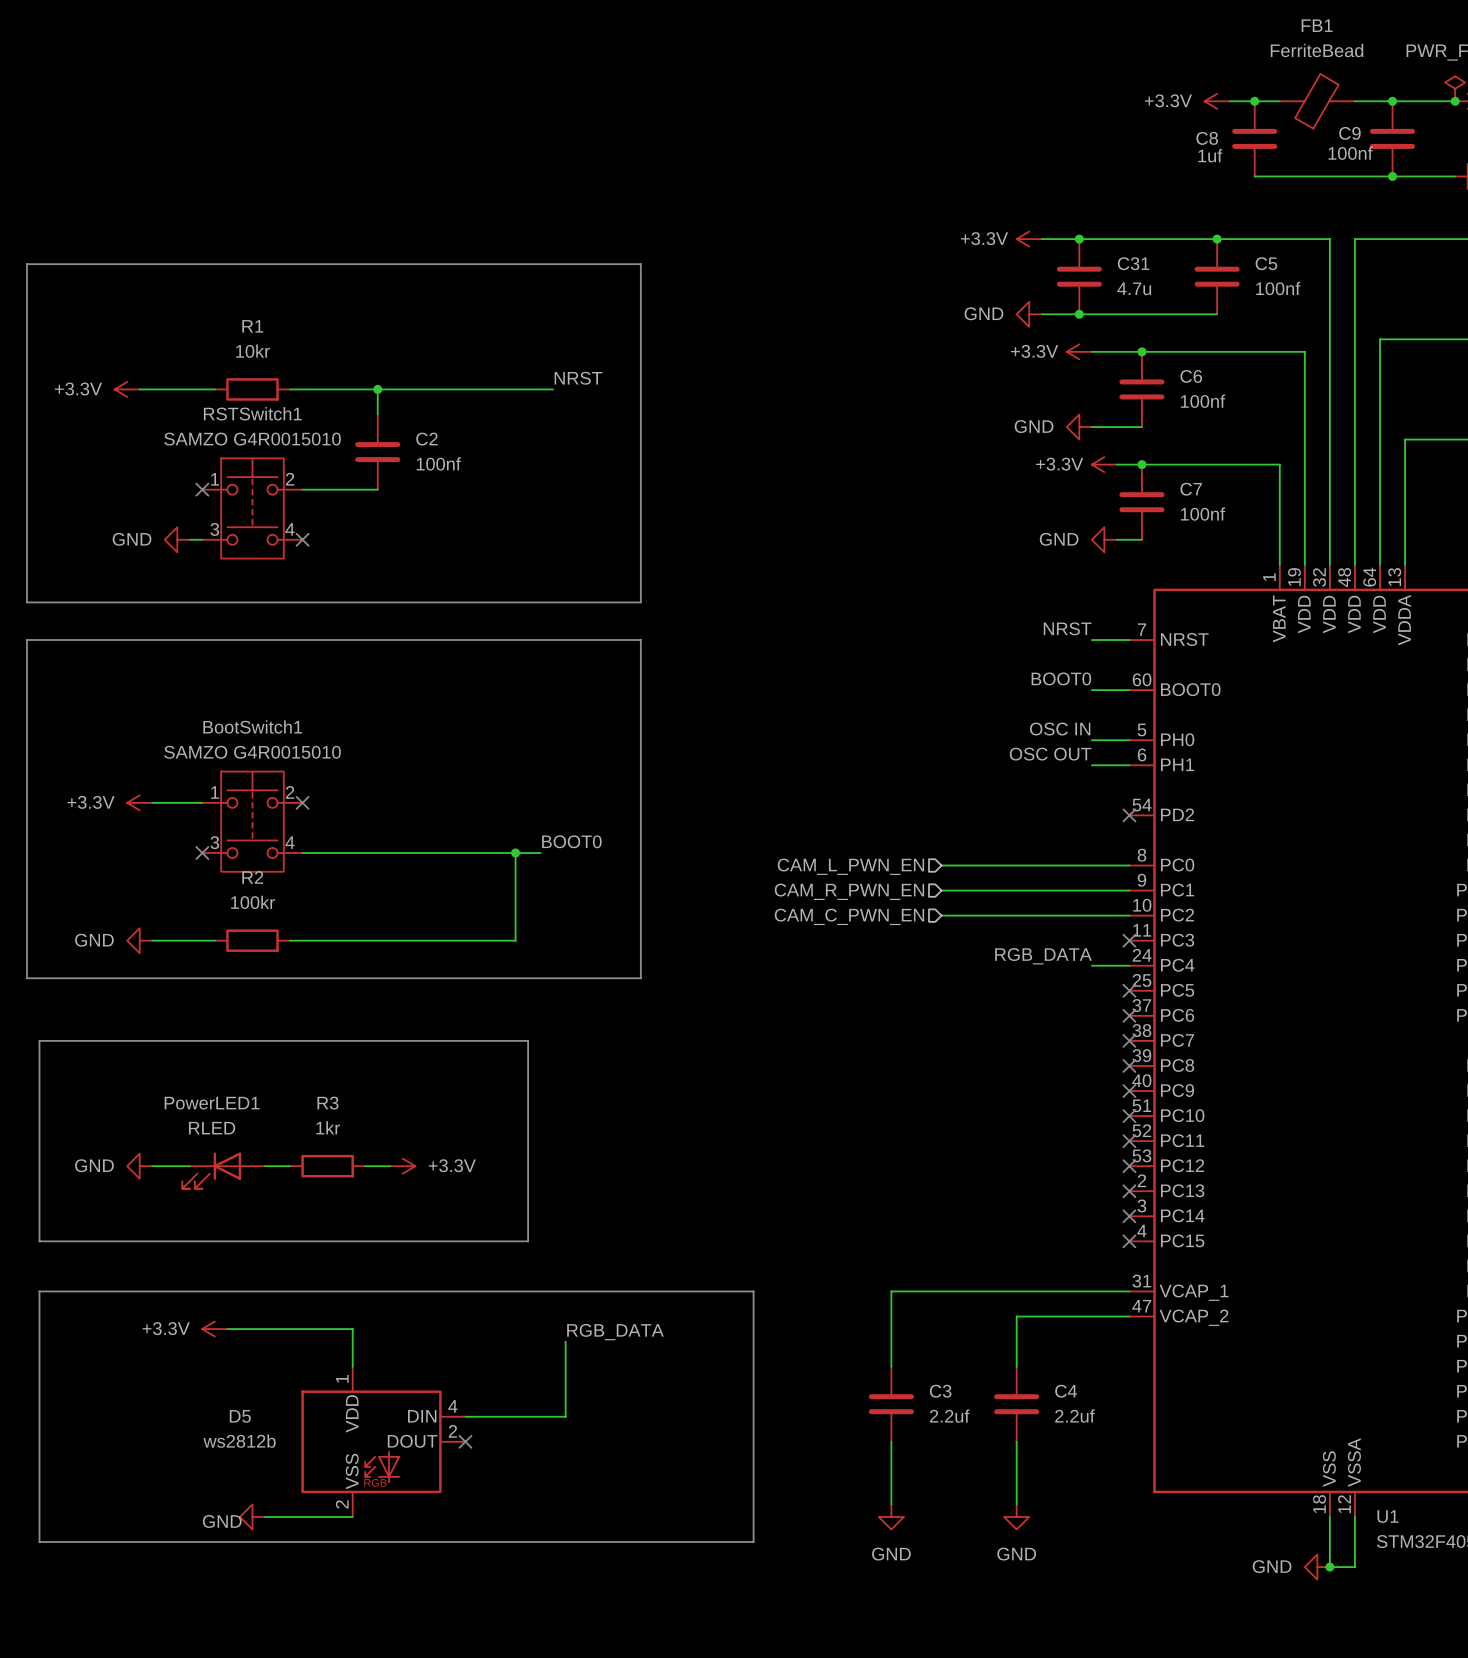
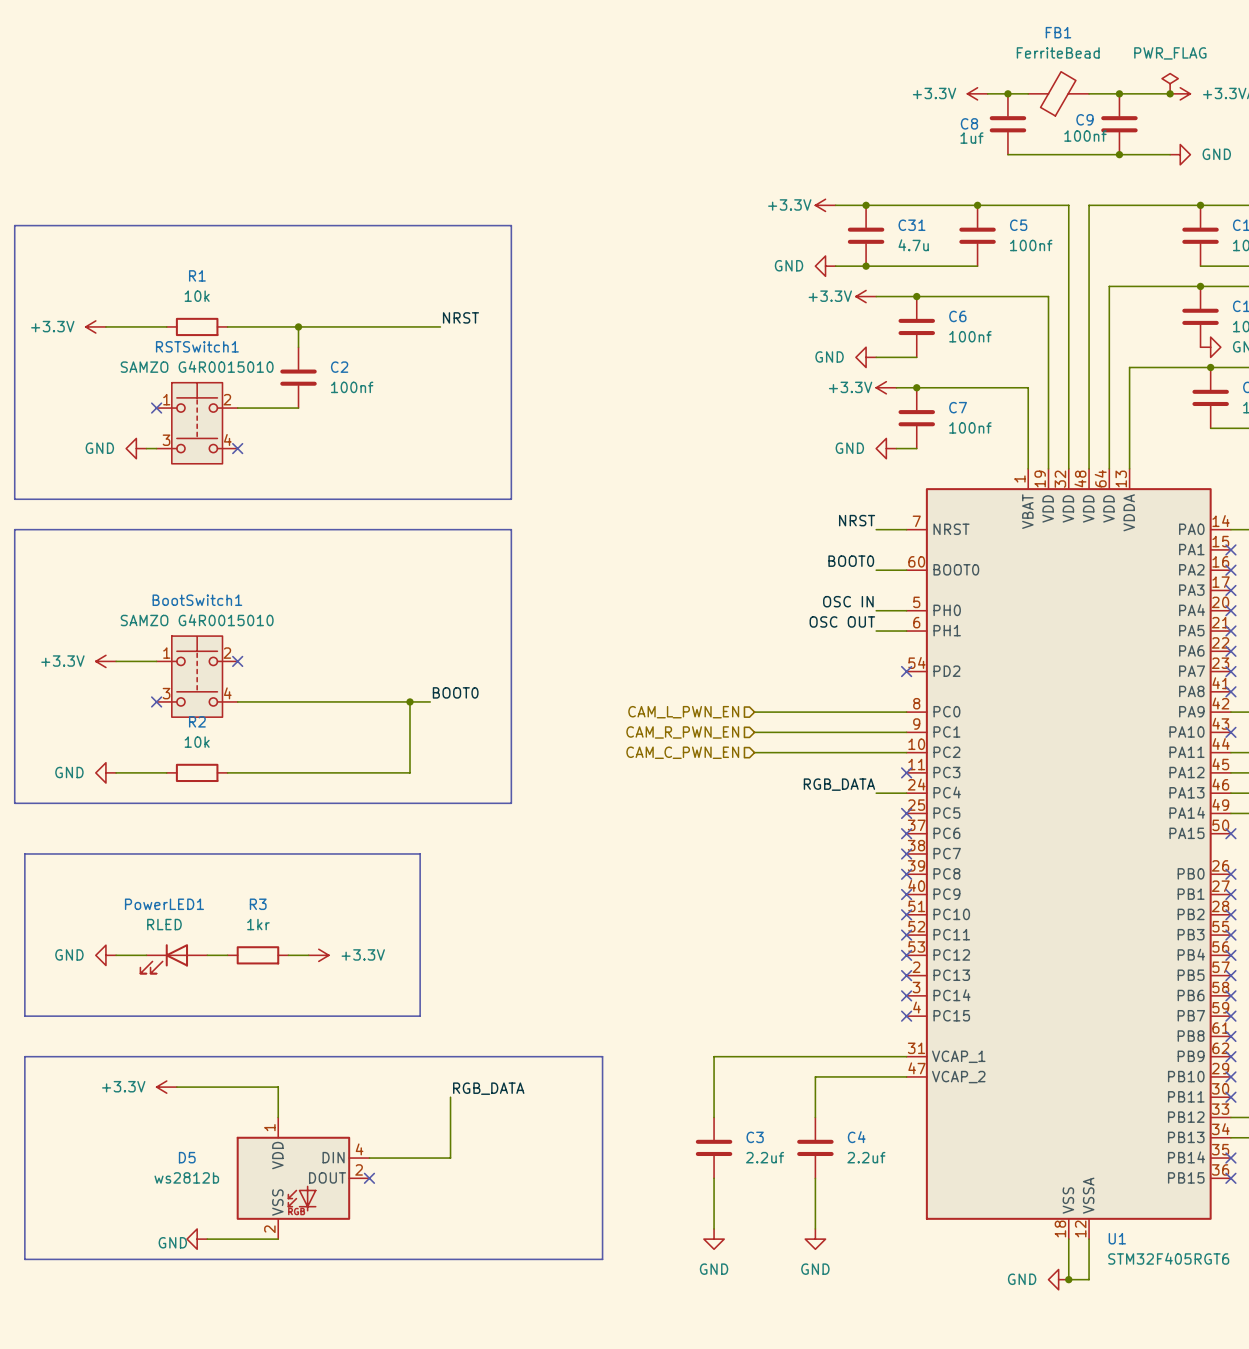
R1 value: 10kr (253, 351) -> 10k (197, 296)
R2 value: 100kr (253, 902) -> 10k (197, 742)

